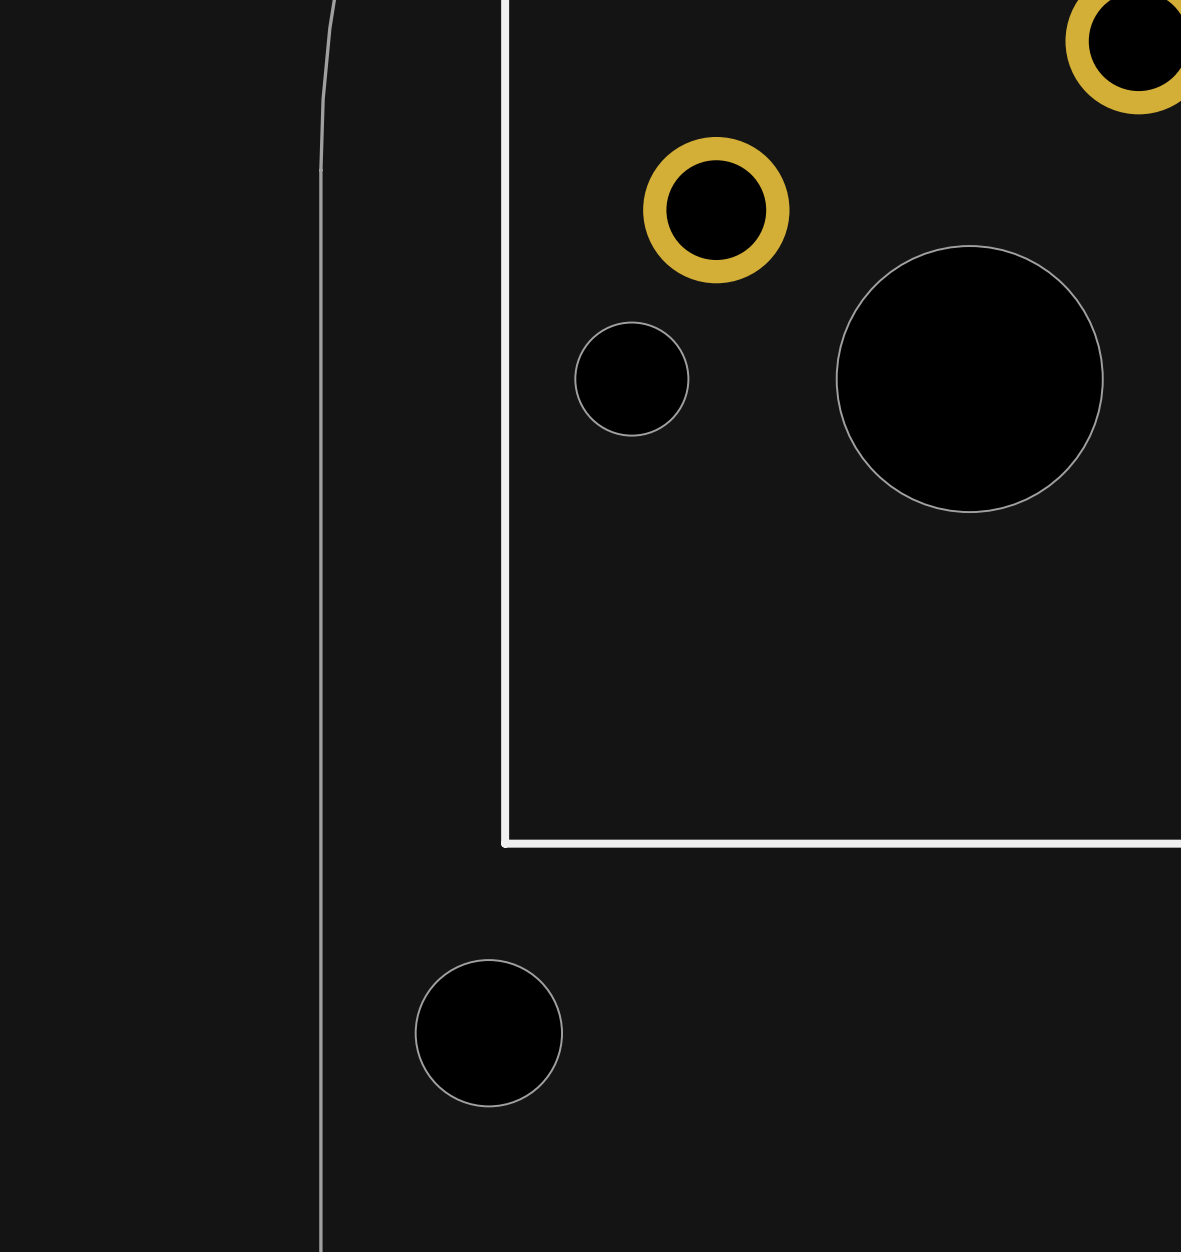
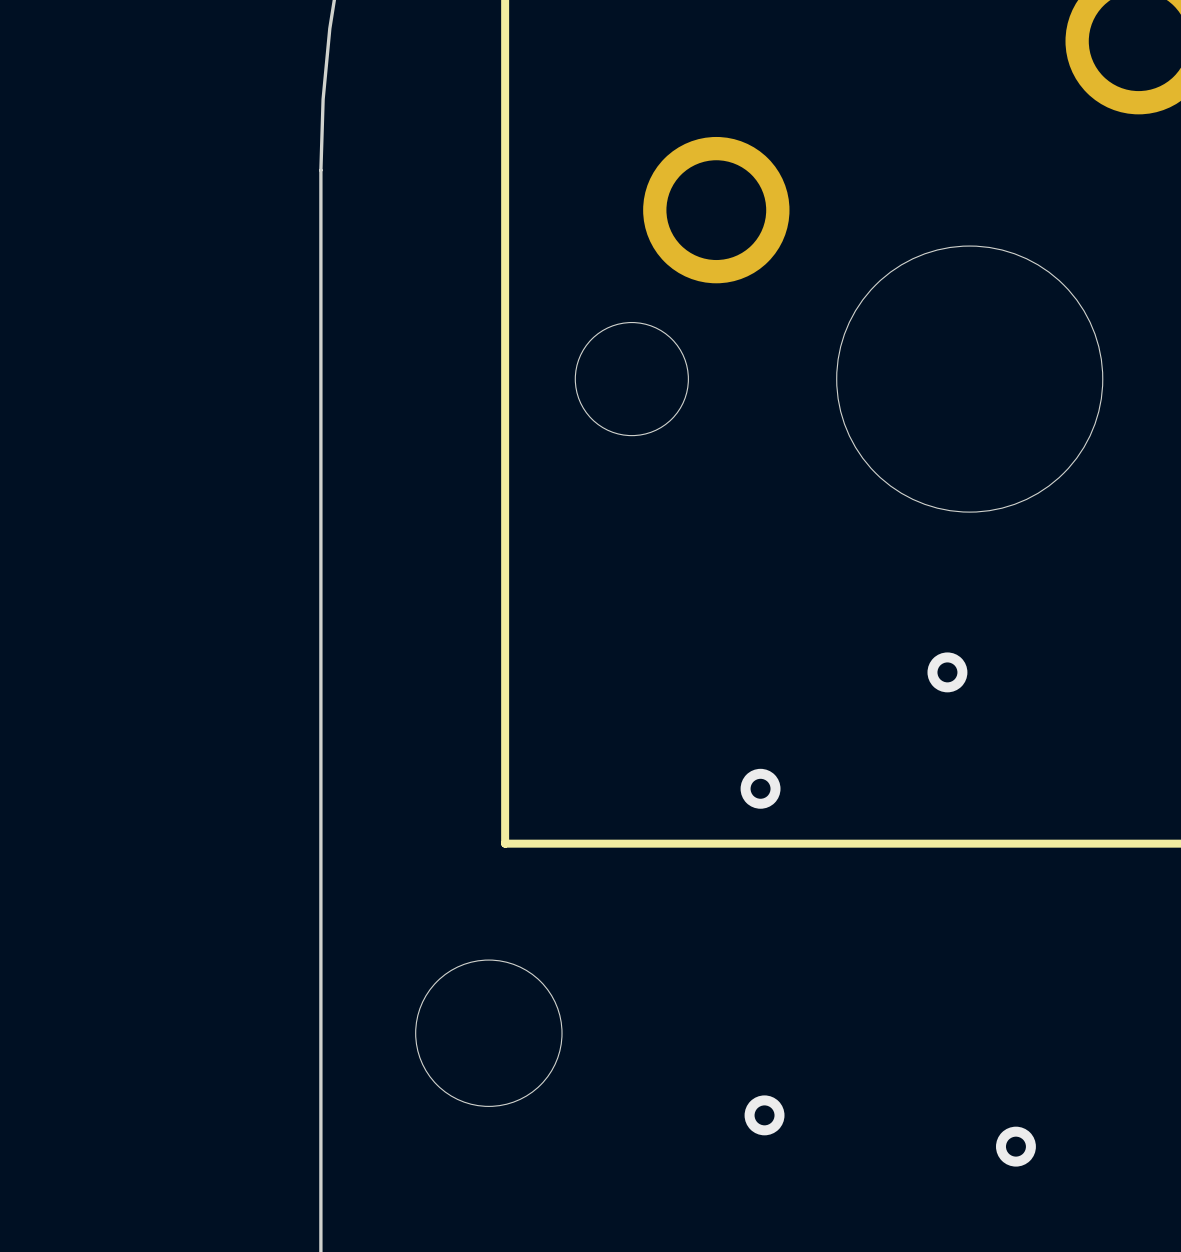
via: none -> (947, 672)
via: none -> (760, 788)
via: none -> (764, 1115)
via: none -> (1015, 1146)

